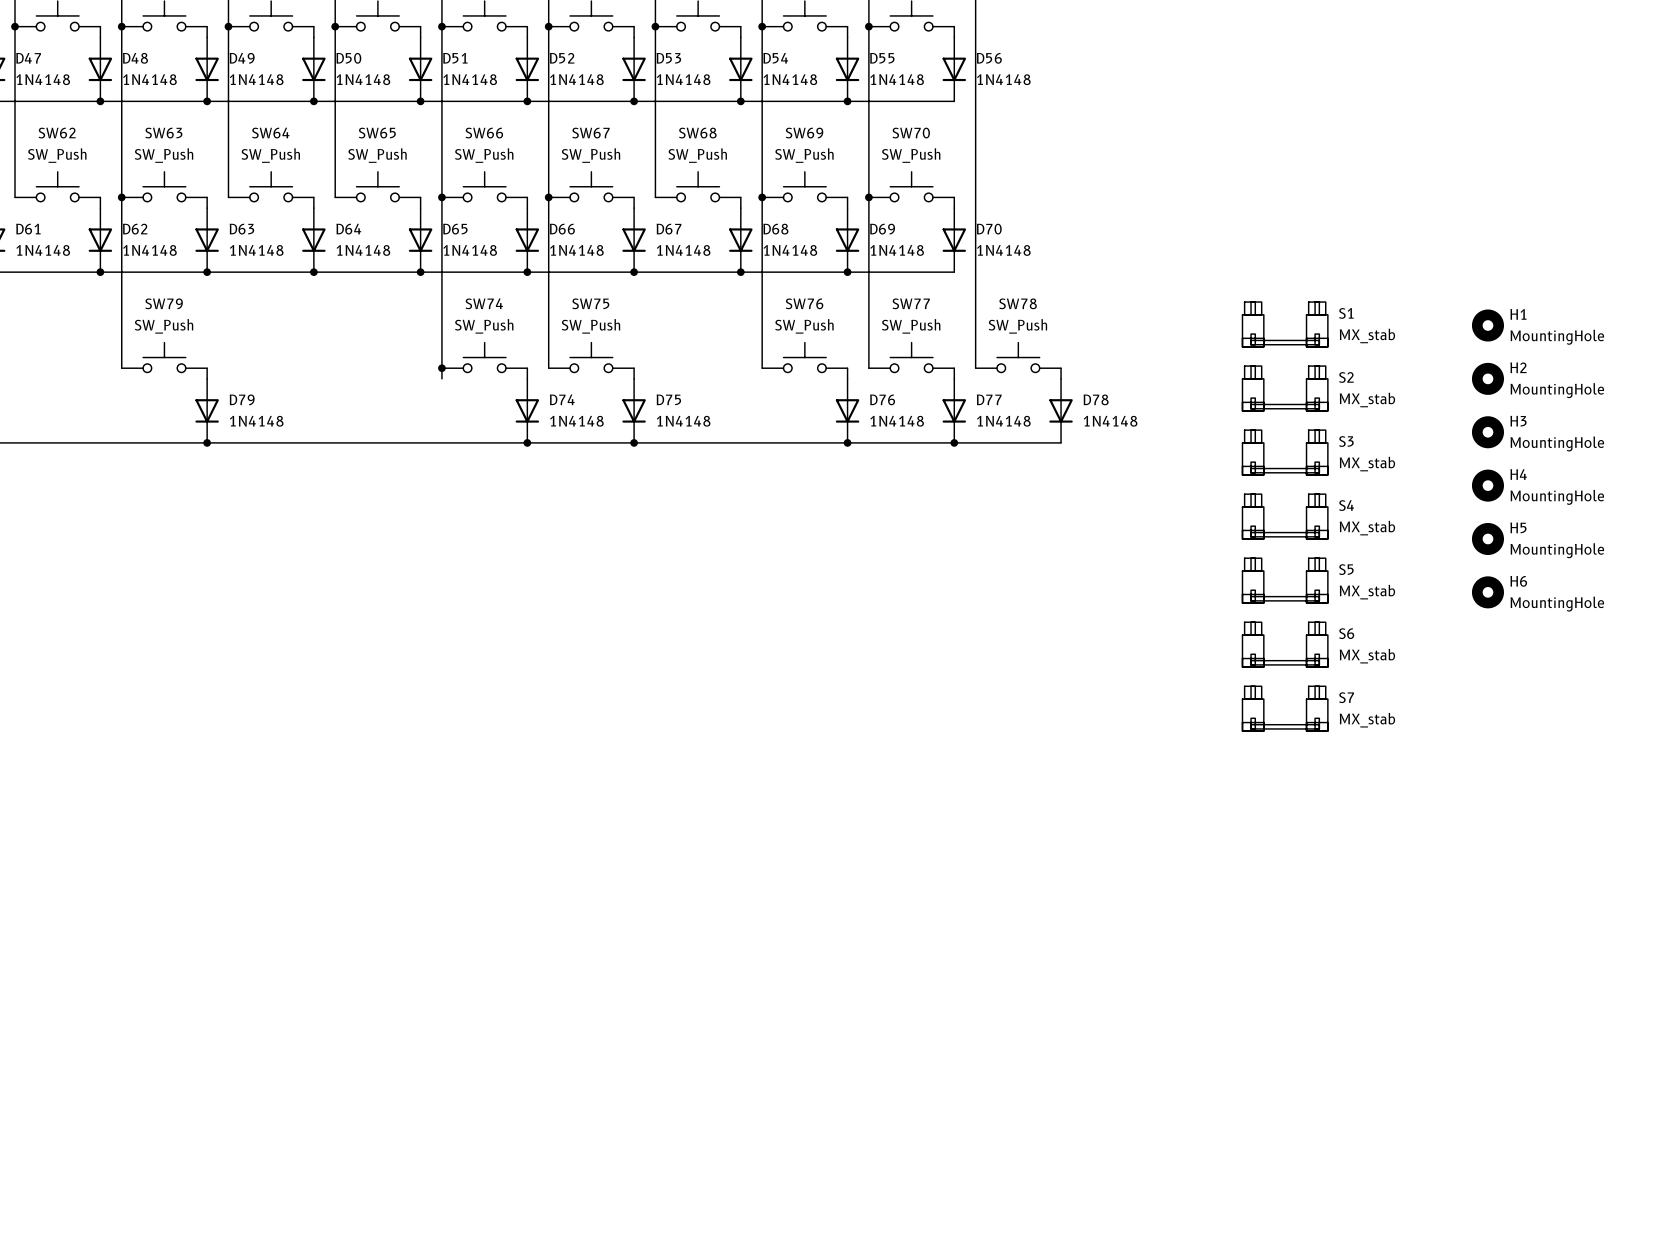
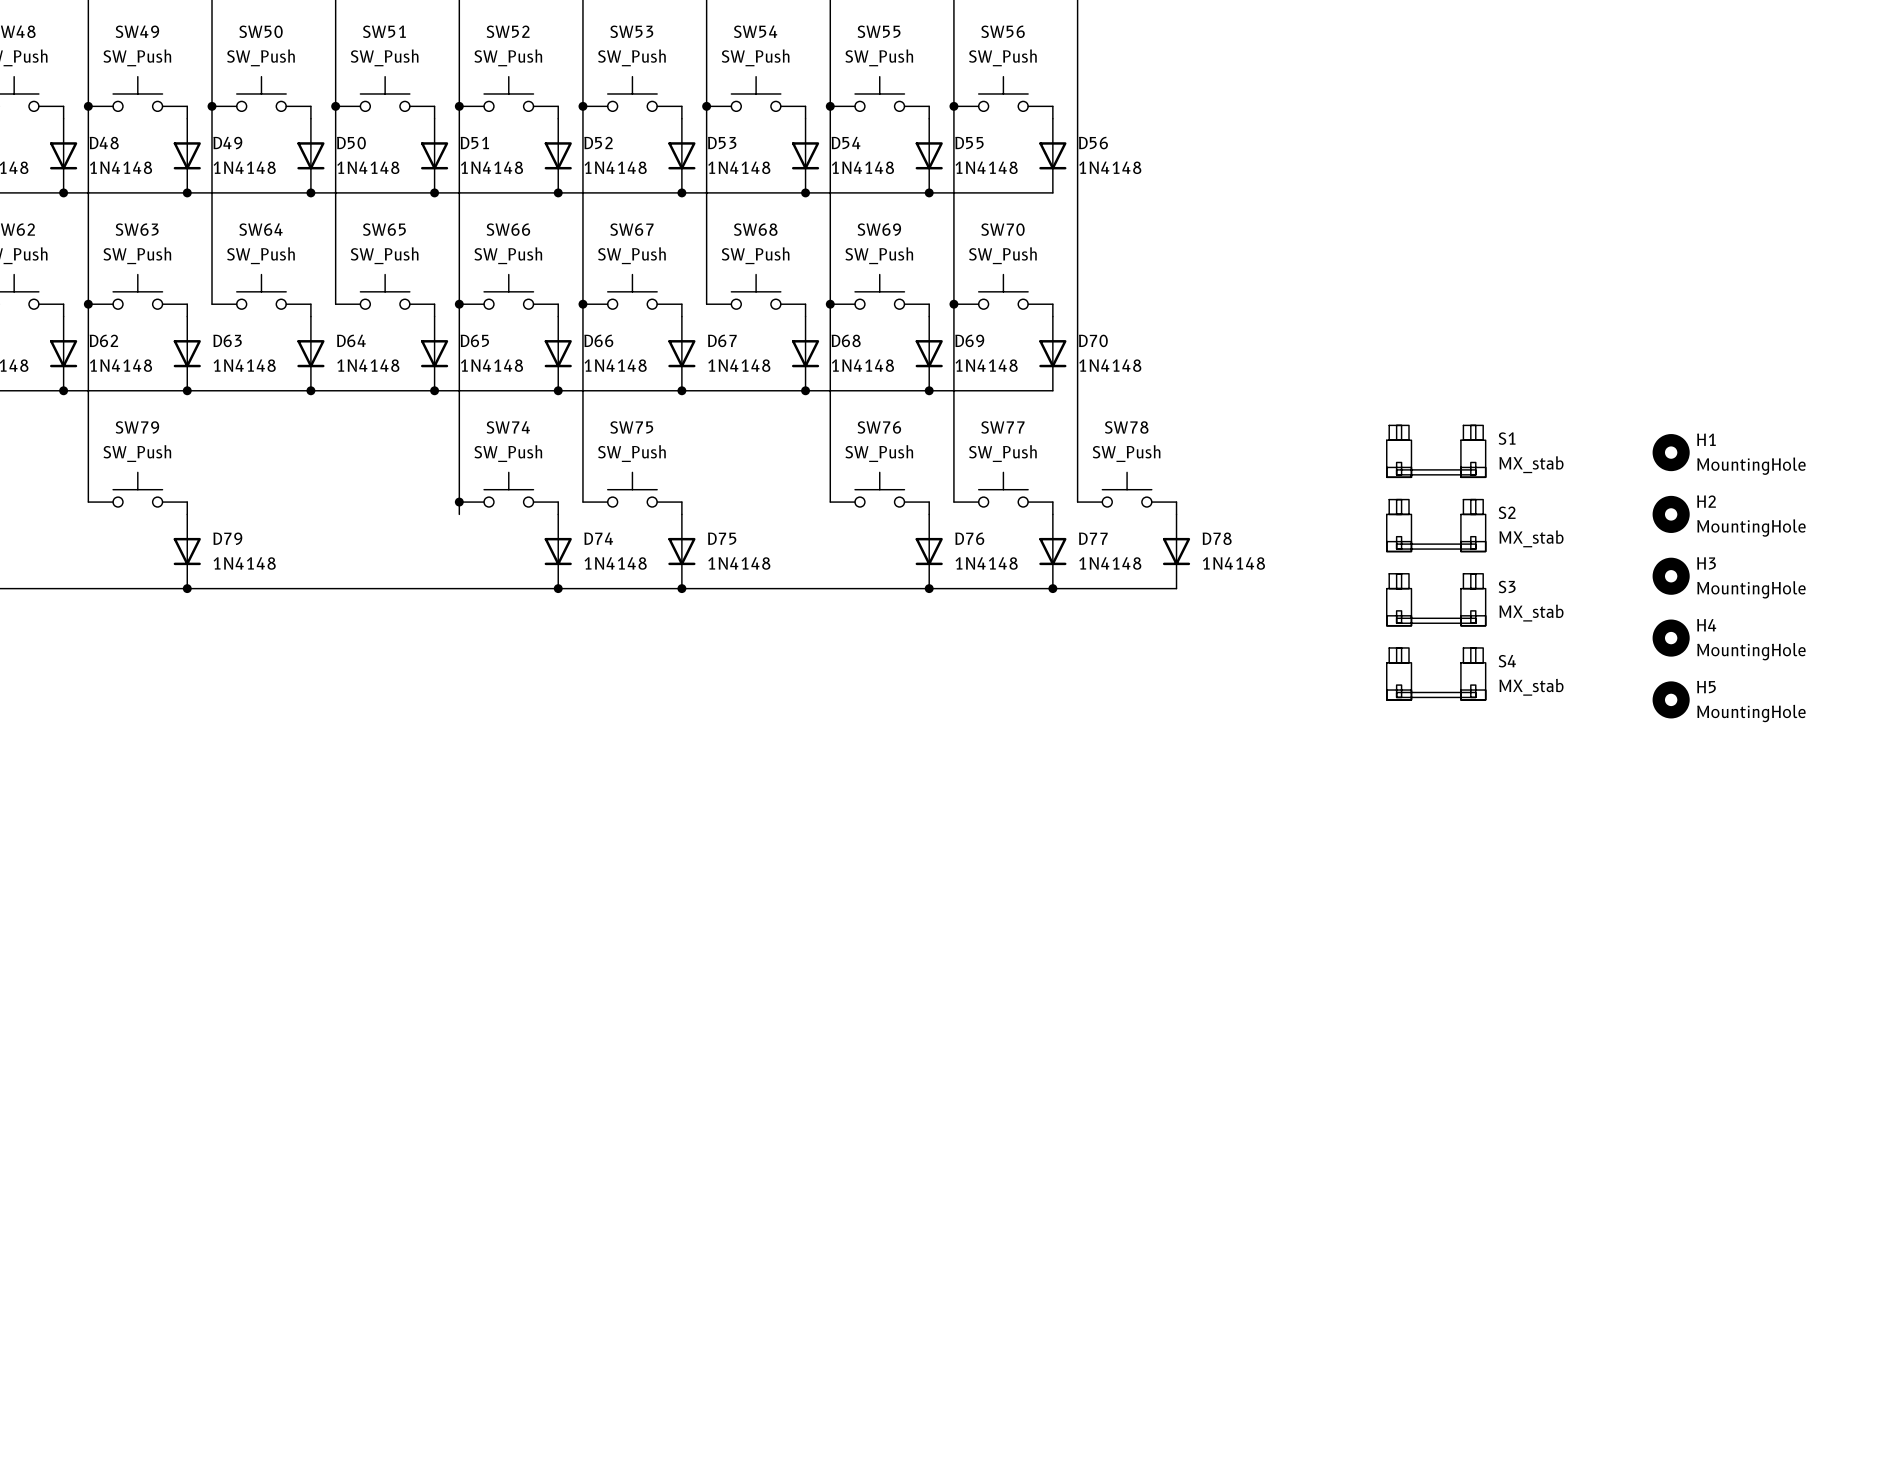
S5: MX_stab (1285, 580) -> none
H6: MountingHole (1487, 592) -> none
S6: MX_stab (1285, 644) -> none
S7: MX_stab (1285, 708) -> none

